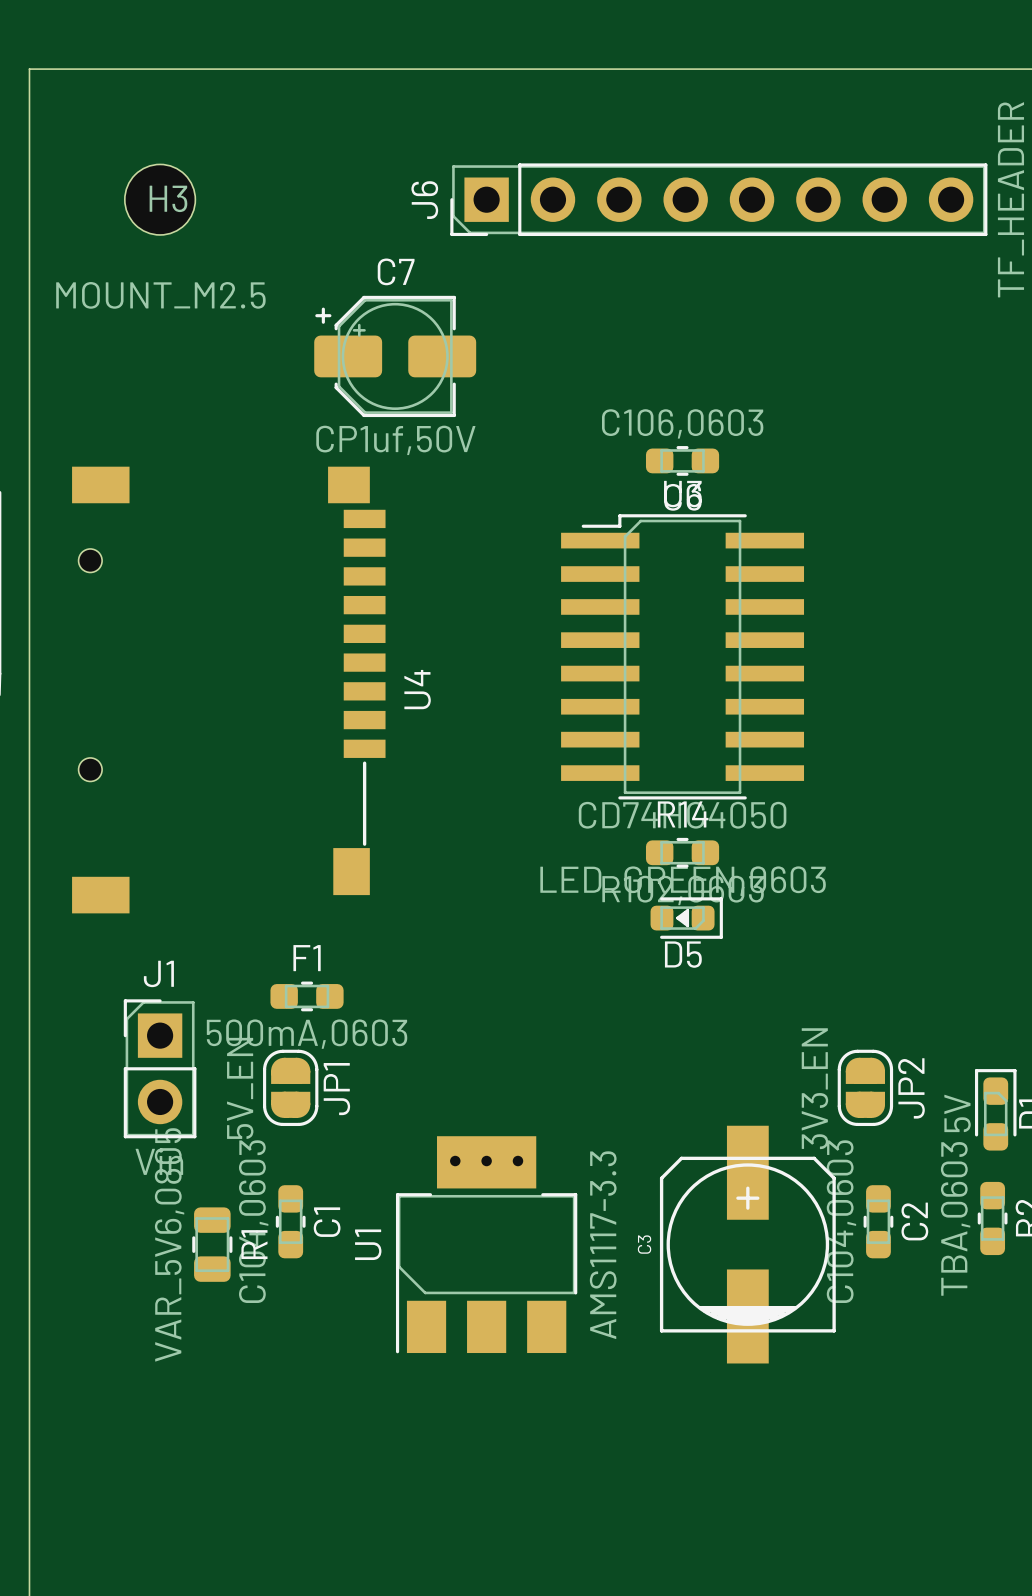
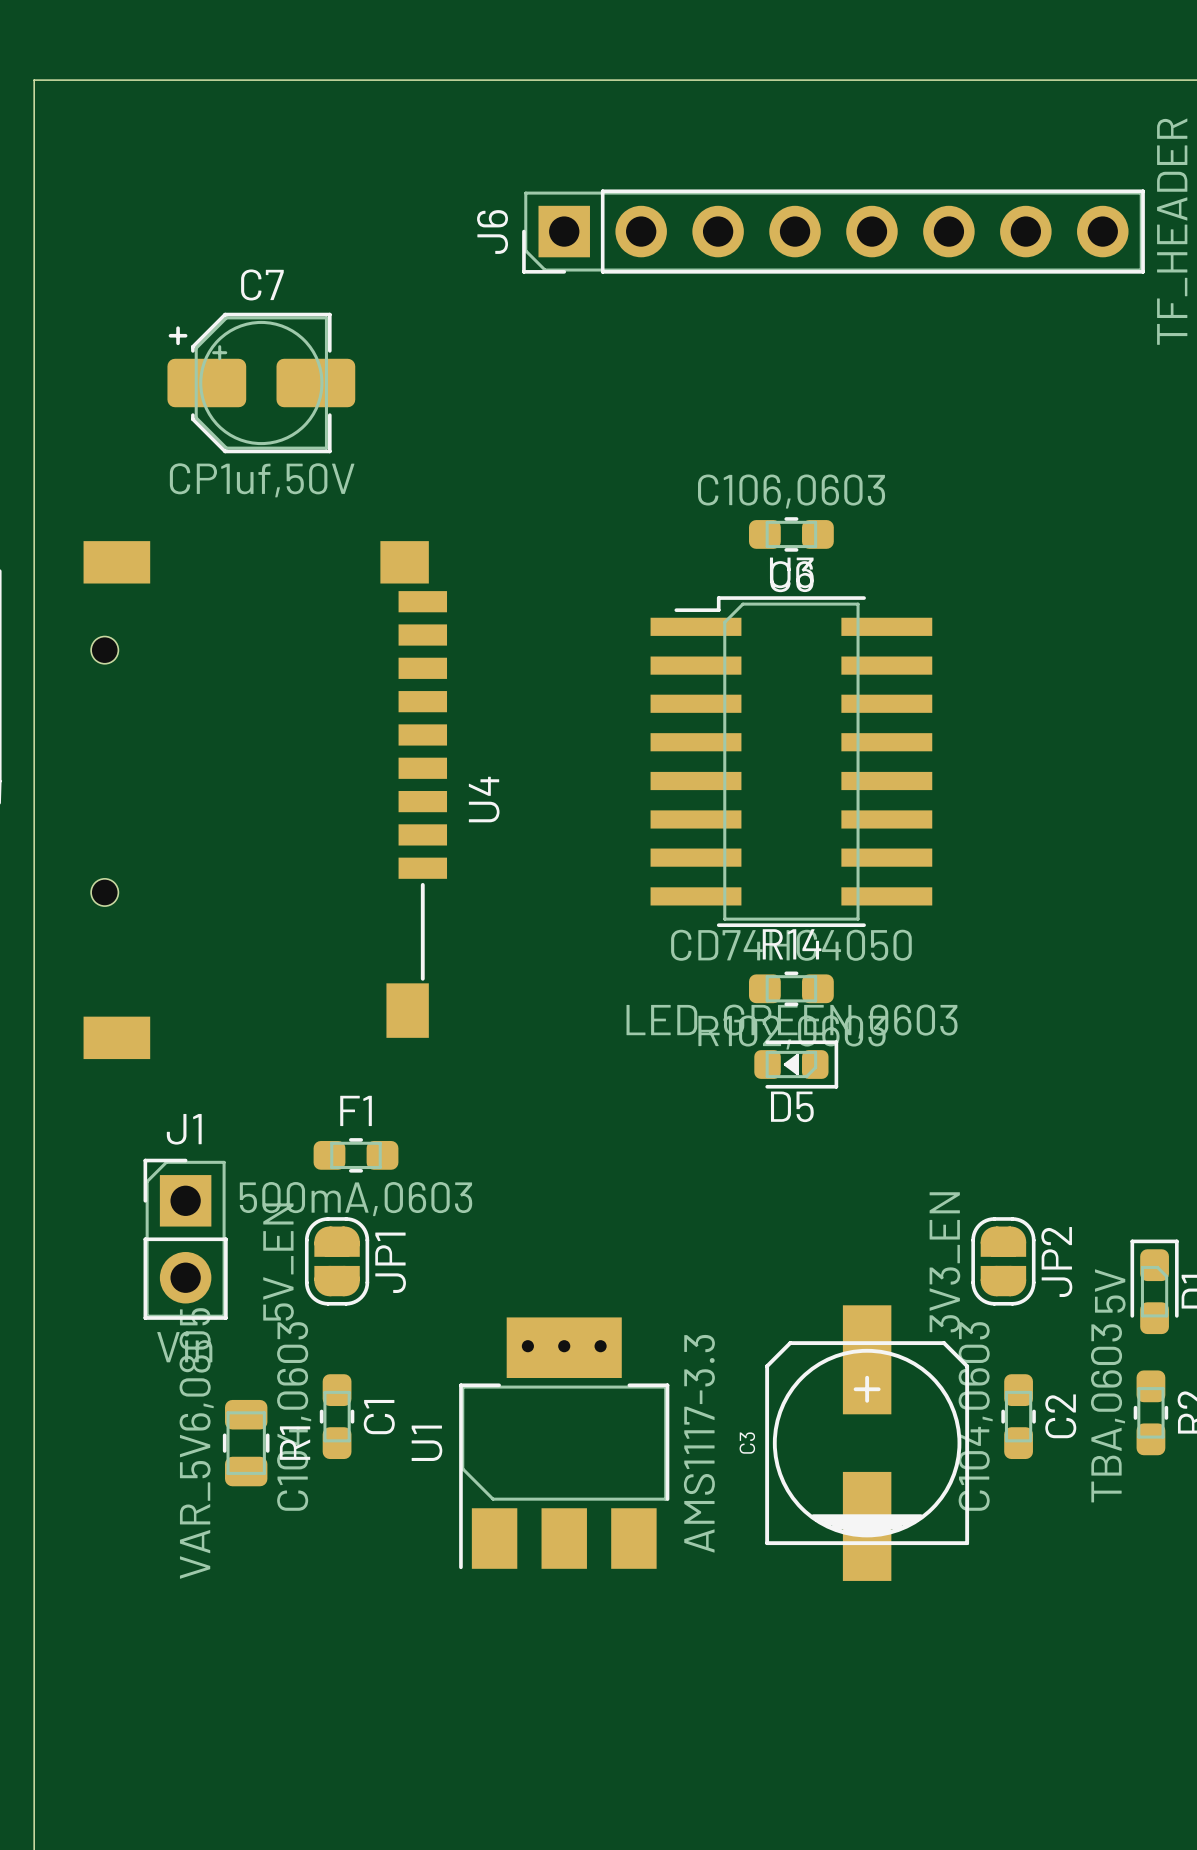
H3: MOUNT_M2.5 (160, 199) -> none
C7 position: (395, 356) -> (261, 383)

